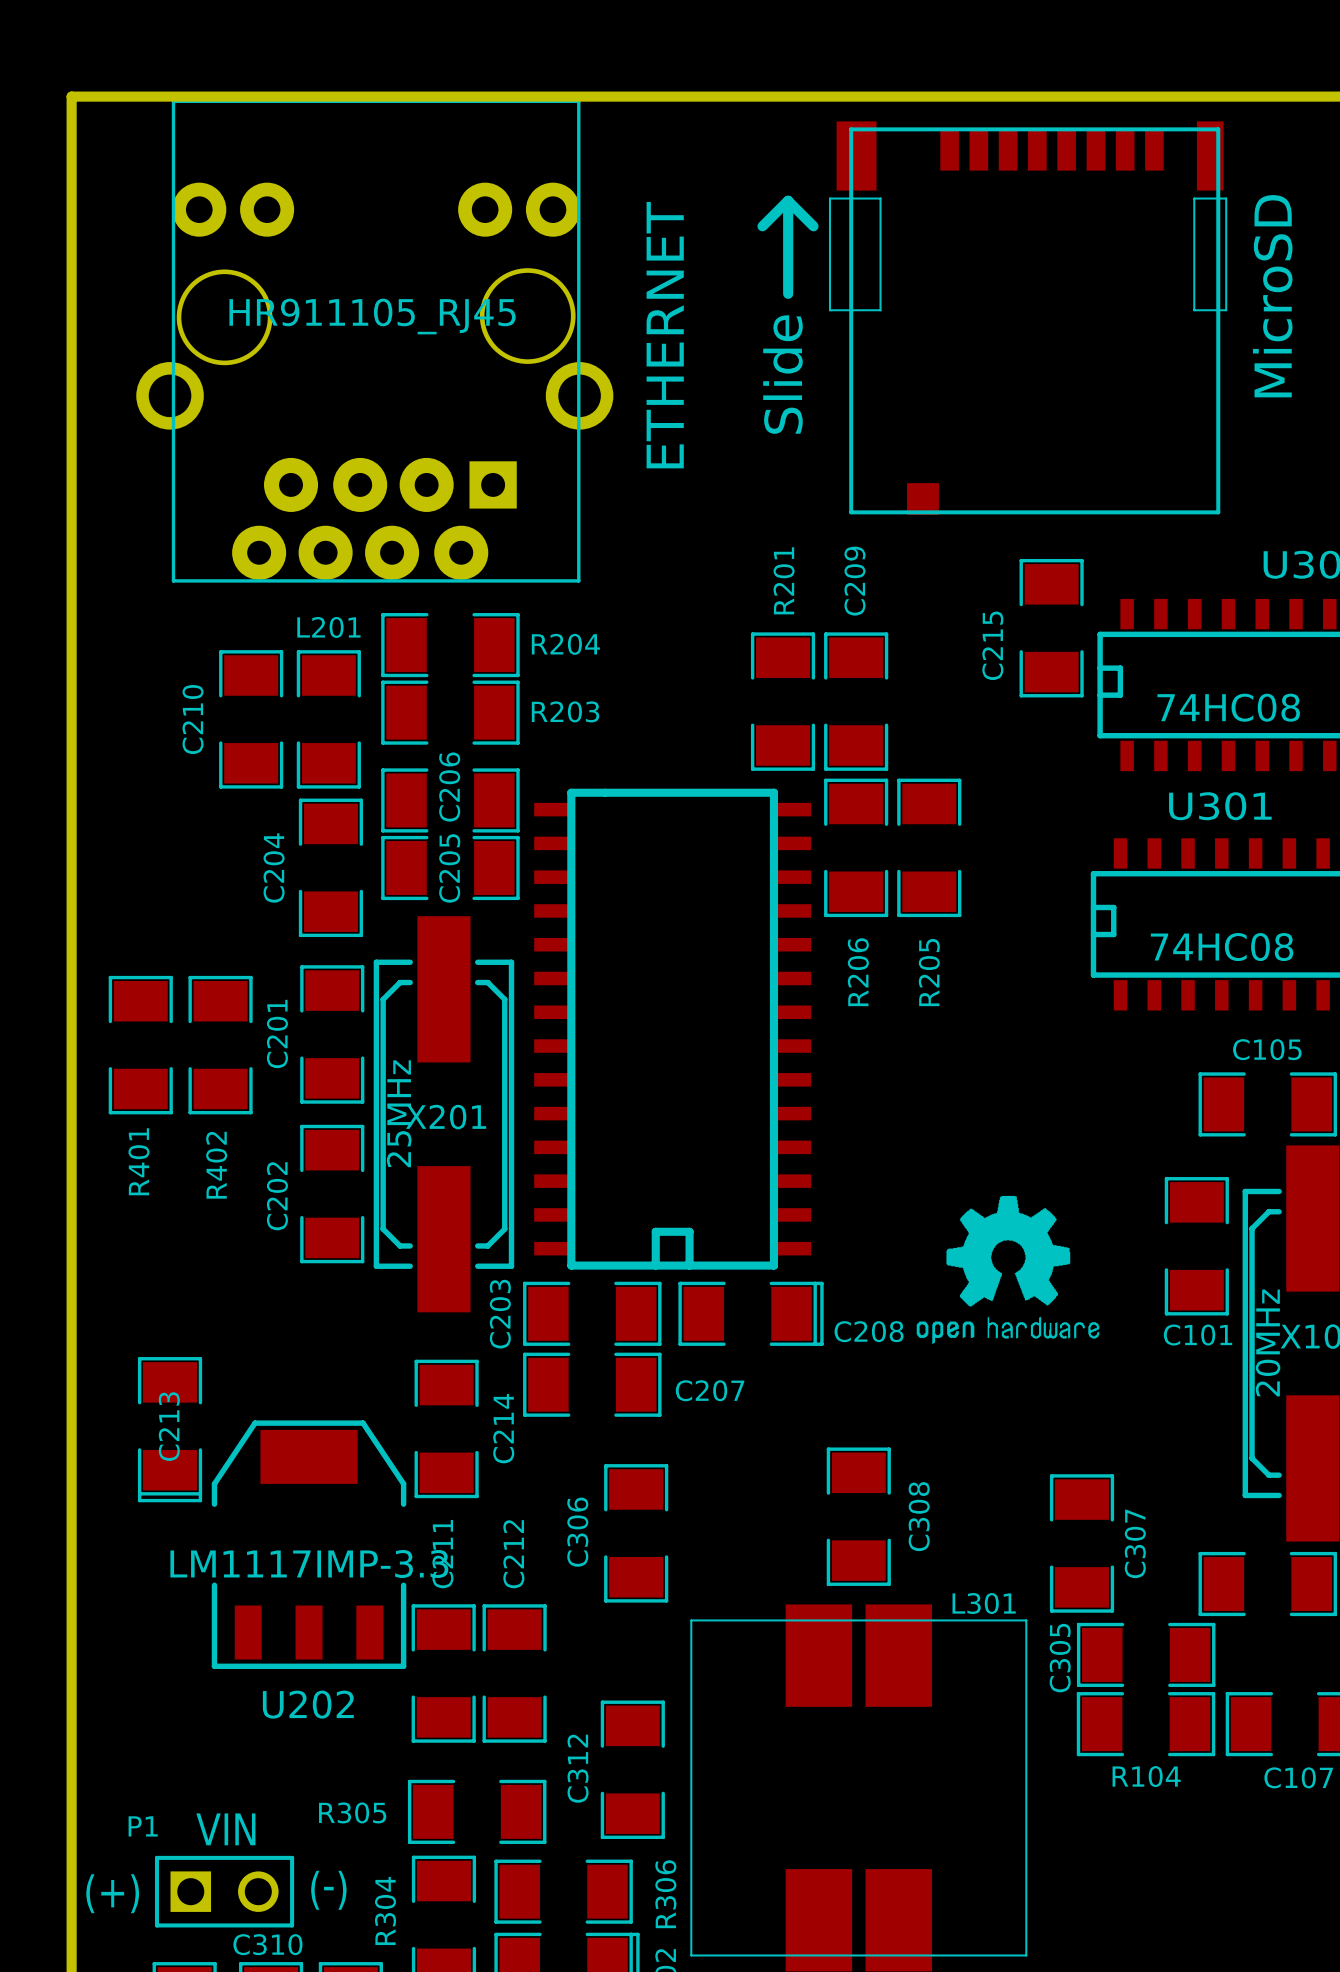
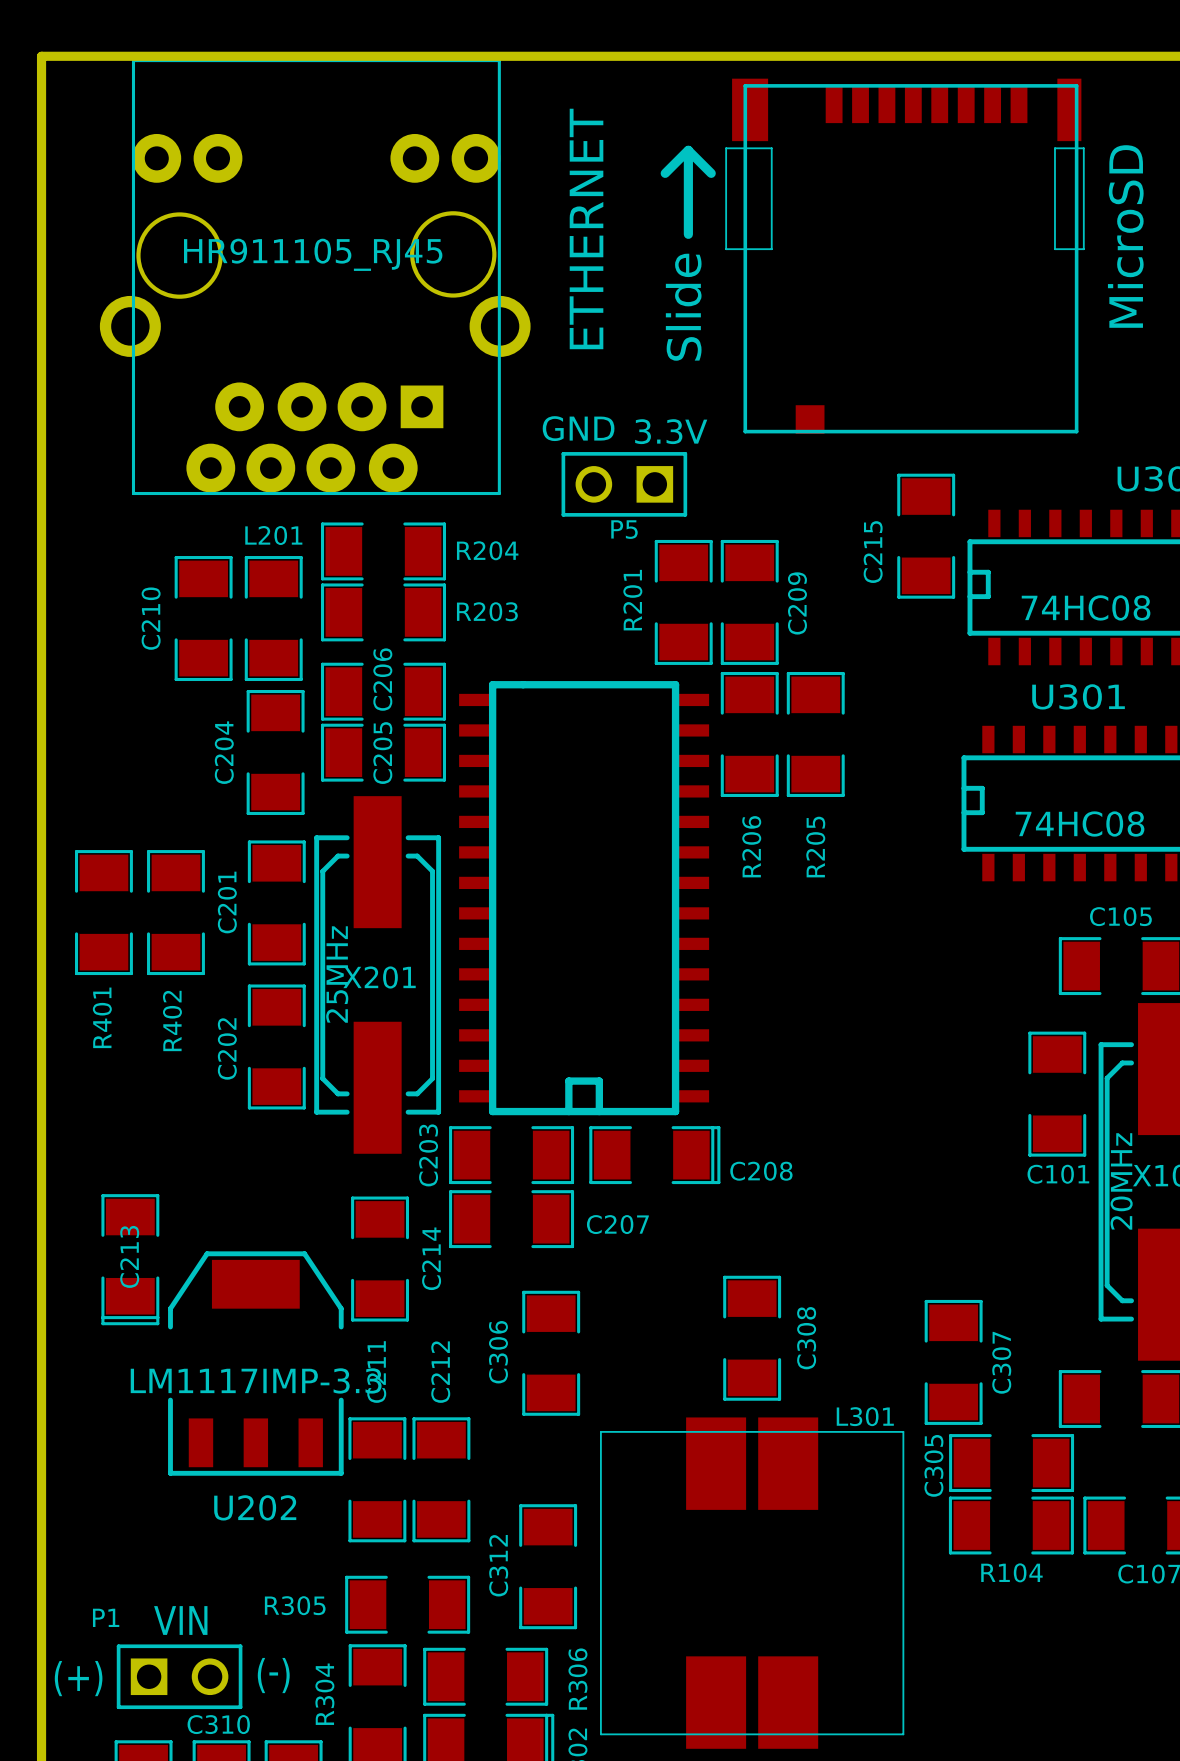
text position: ETHERNET (665, 335) -> ETHERNET (586, 228)
text: none -> GND (578, 428)
text: none -> 3.3V (671, 431)
P5: none -> (624, 484)
R201 name position: R201 (784, 580) -> R201 (632, 600)
C209 name position: C209 (854, 581) -> C209 (797, 603)
drawing: [916, 1195, 1100, 1344] -> none

